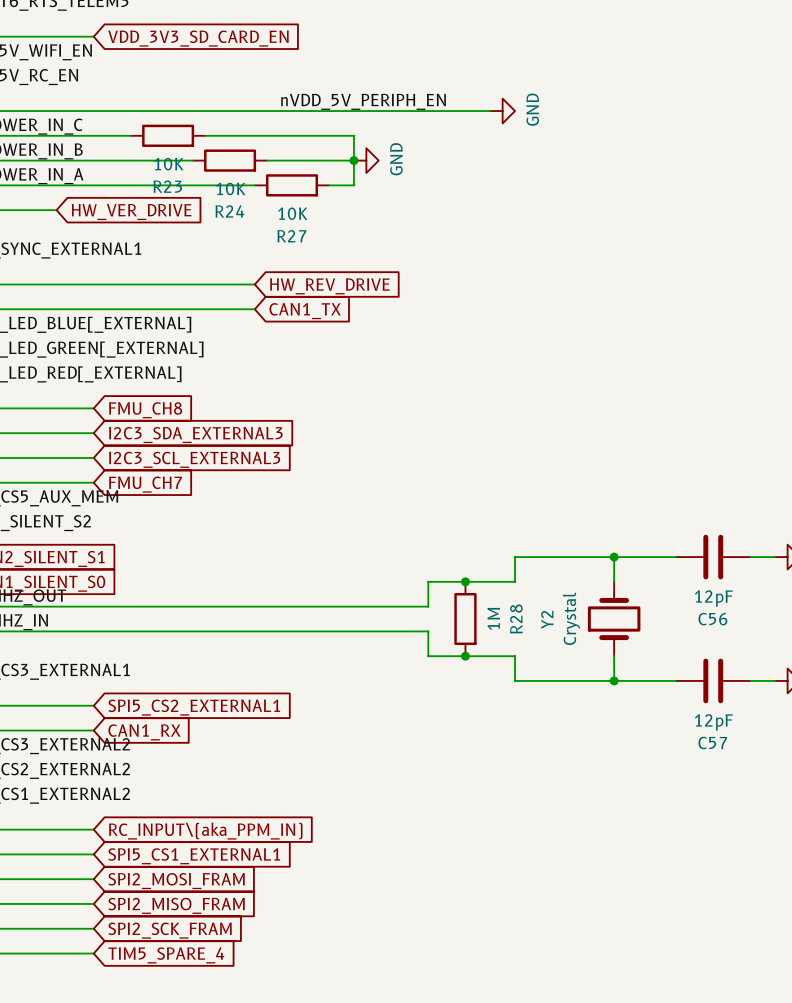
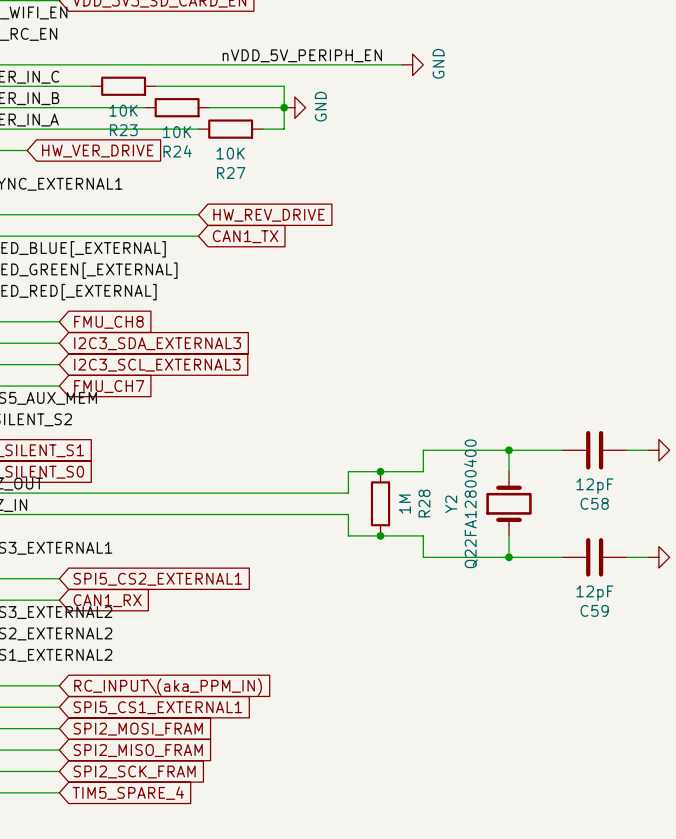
Y2 value: Crystal (571, 618) -> Q22FA12800400 (470, 503)
C56 name: C56 (712, 619) -> C58 (594, 503)
C57 name: C57 (712, 743) -> C59 (594, 610)

